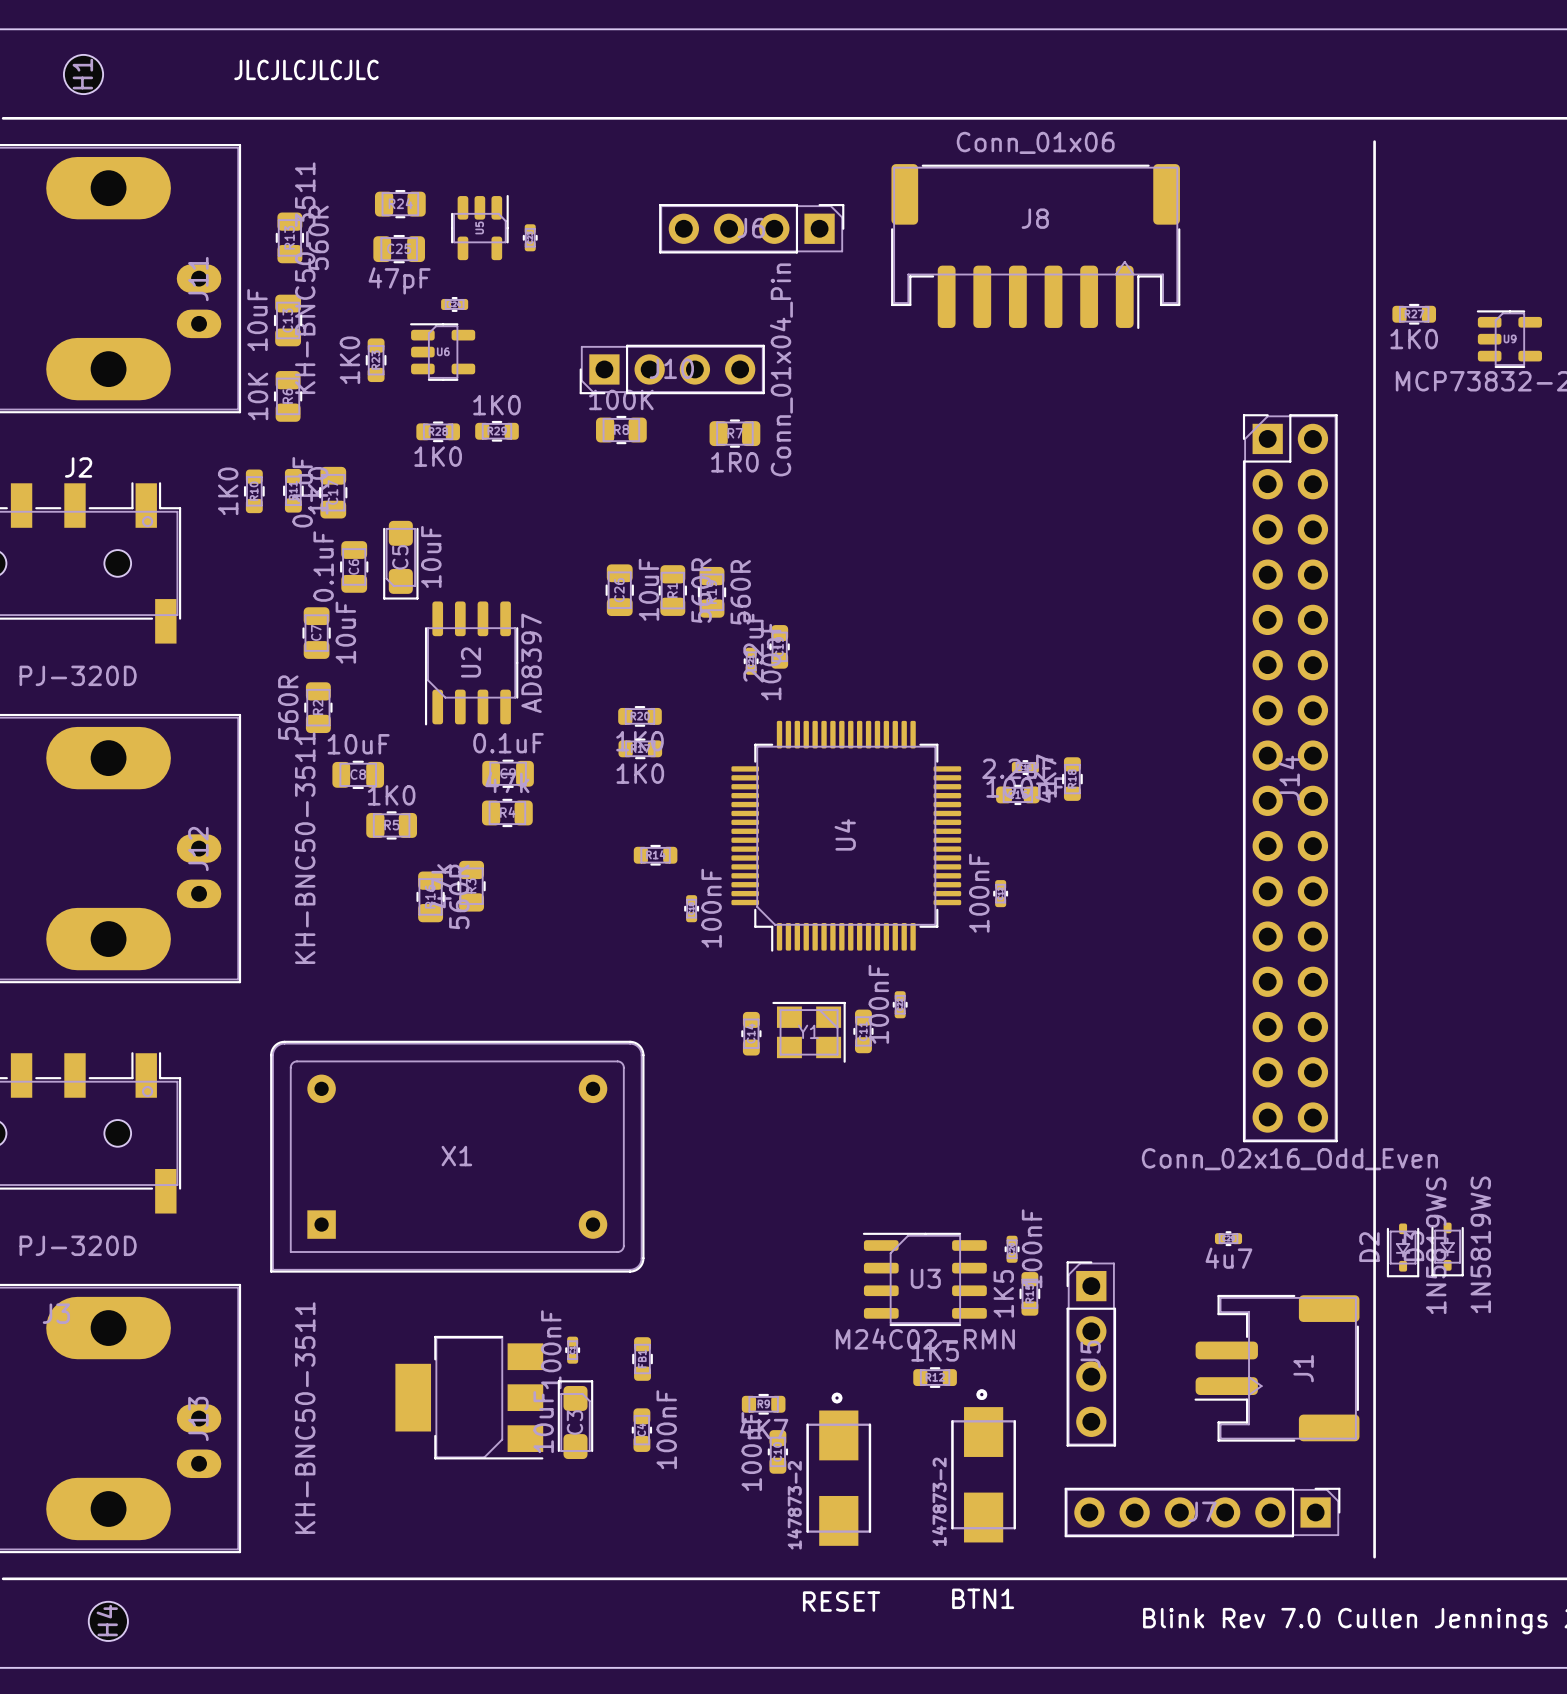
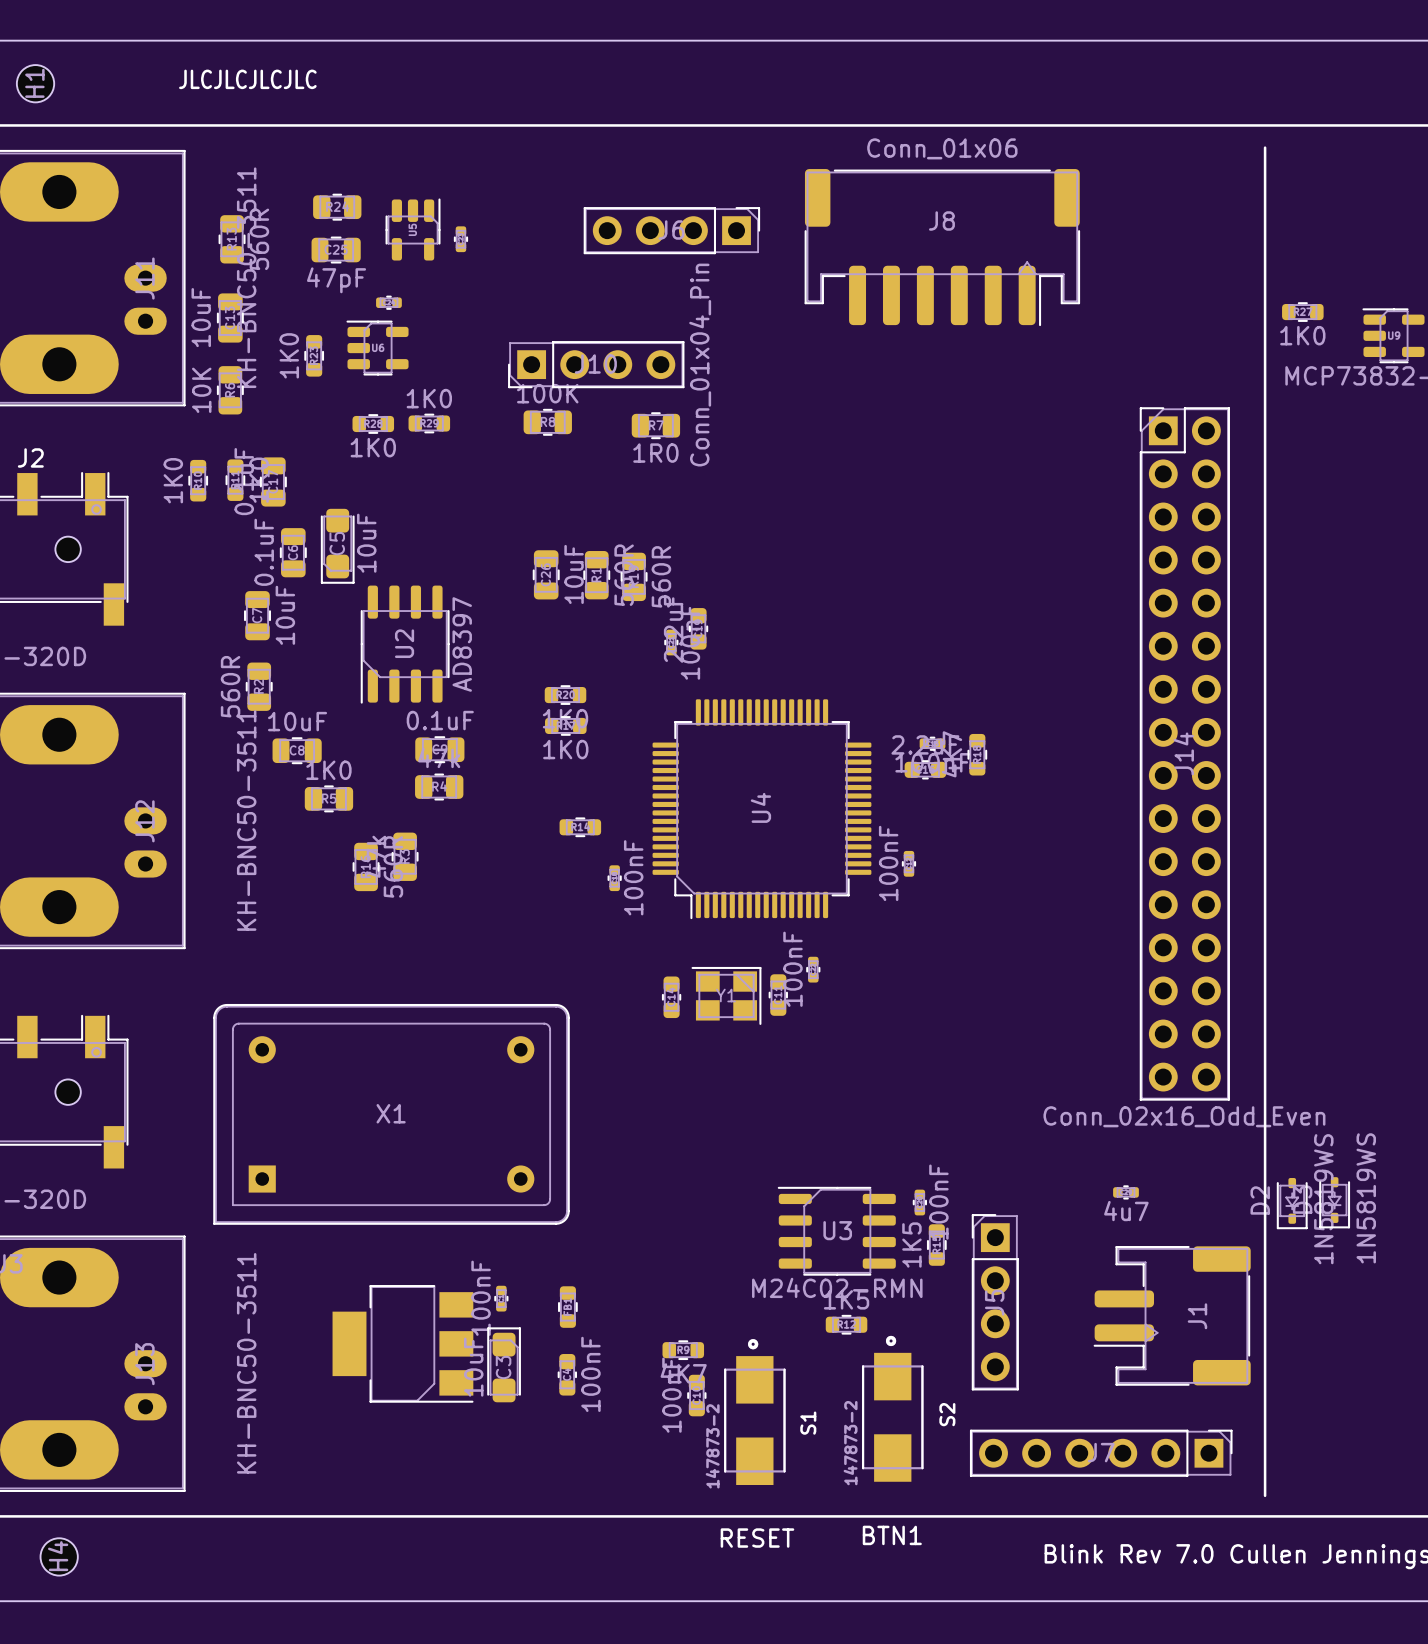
S2 name: none -> S2 (947, 1414)
S1 name: none -> S1 (808, 1423)

